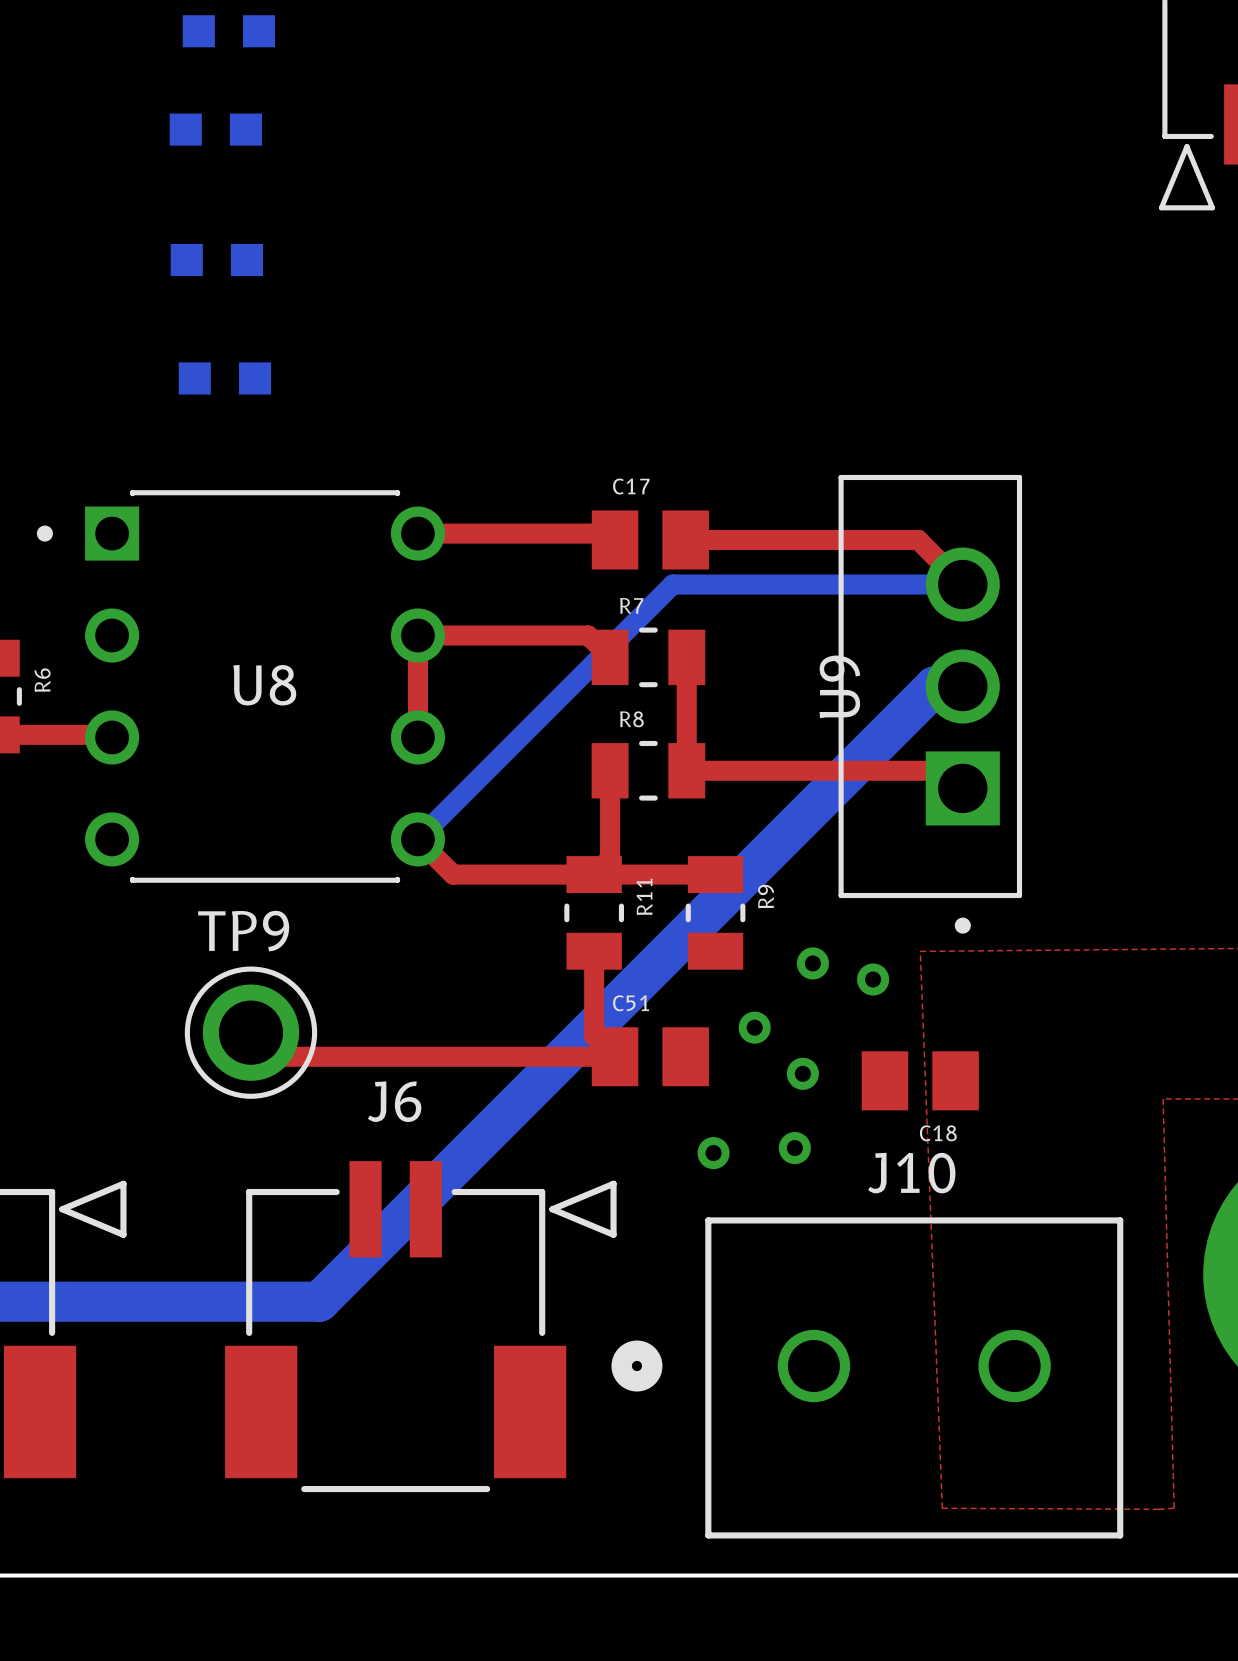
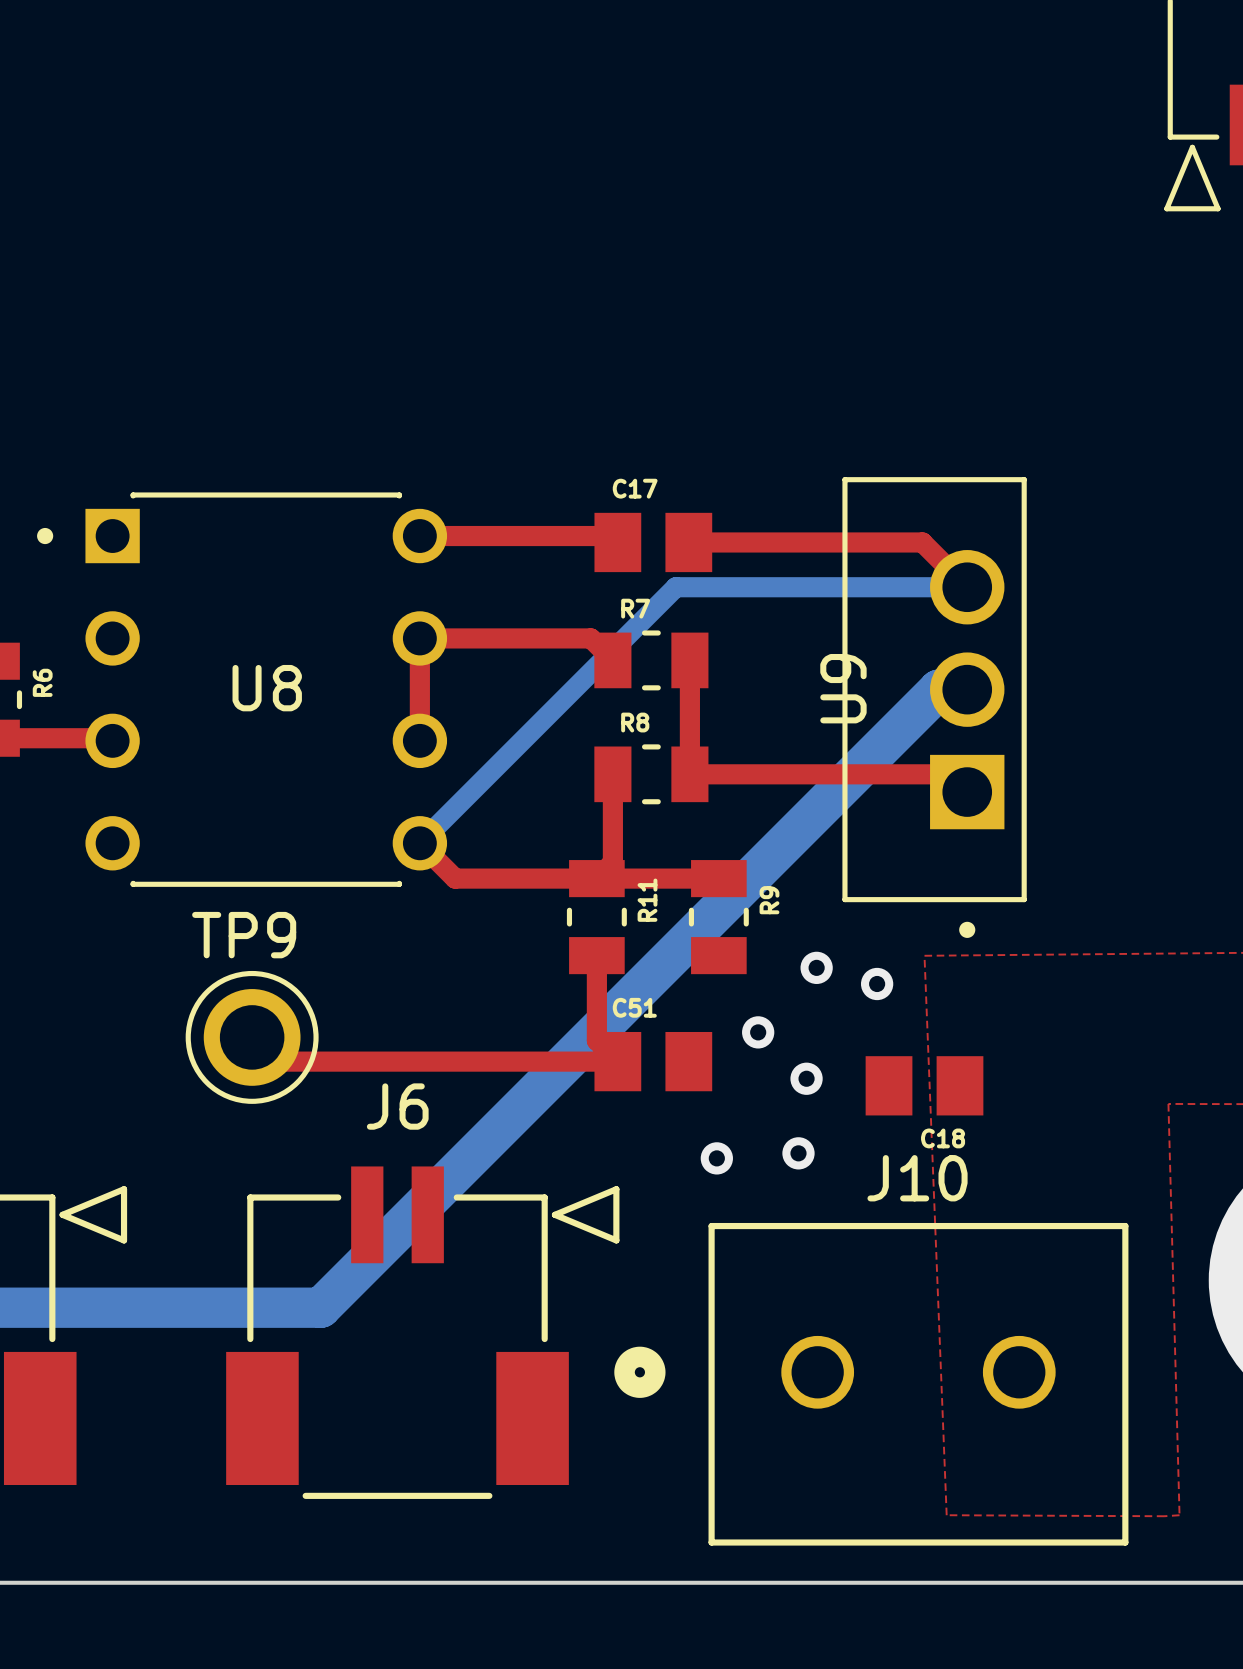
part: (228, 31) -> none
part: (215, 129) -> none
part: (216, 260) -> none
part: (224, 378) -> none

